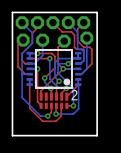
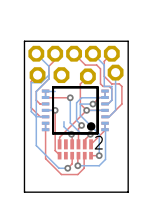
bottom track: none -> (48, 75) (41, 82) (31, 82) (31, 111) (36, 116)
bottom track: (42, 40) (42, 55) (34, 63) (29, 63) -> none
top track: (37, 53) (51, 53) (55, 56) (55, 67) (44, 78) -> none
via: (37, 53) -> none
via: (44, 78) -> none

